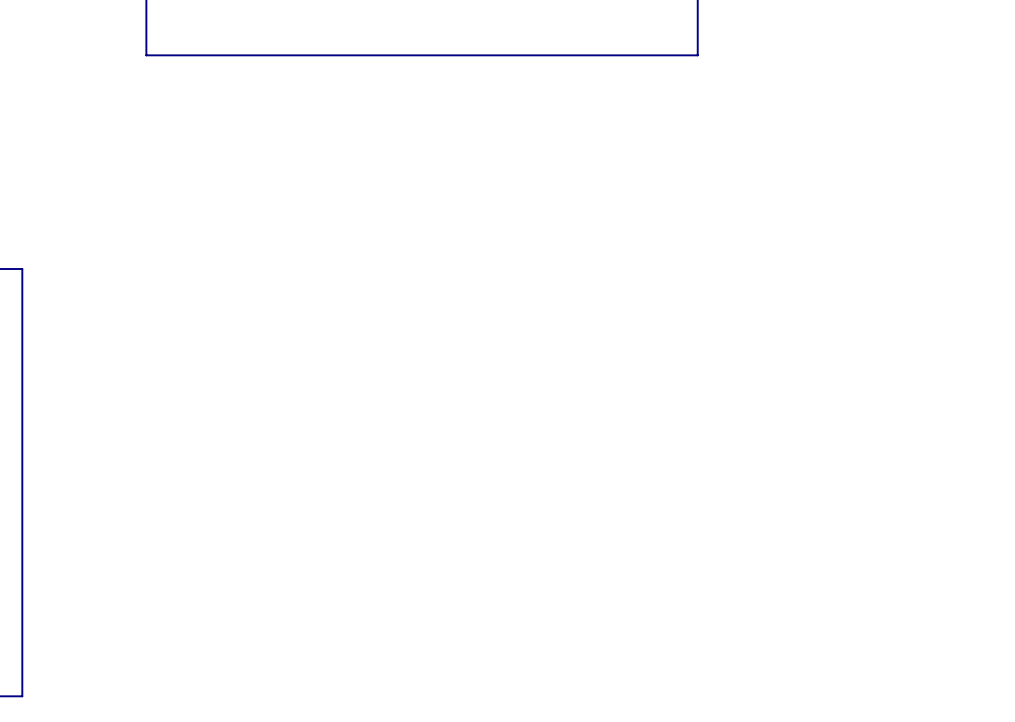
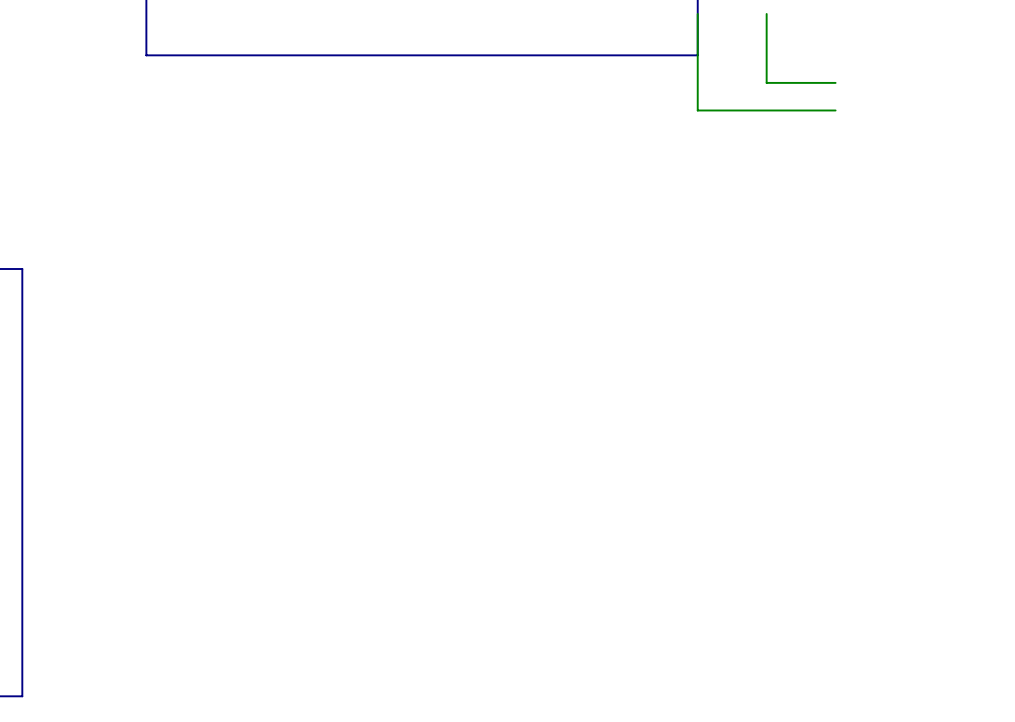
wire: none -> (697, 13) (697, 110) (835, 110)
wire: none -> (766, 13) (766, 82) (835, 82)

